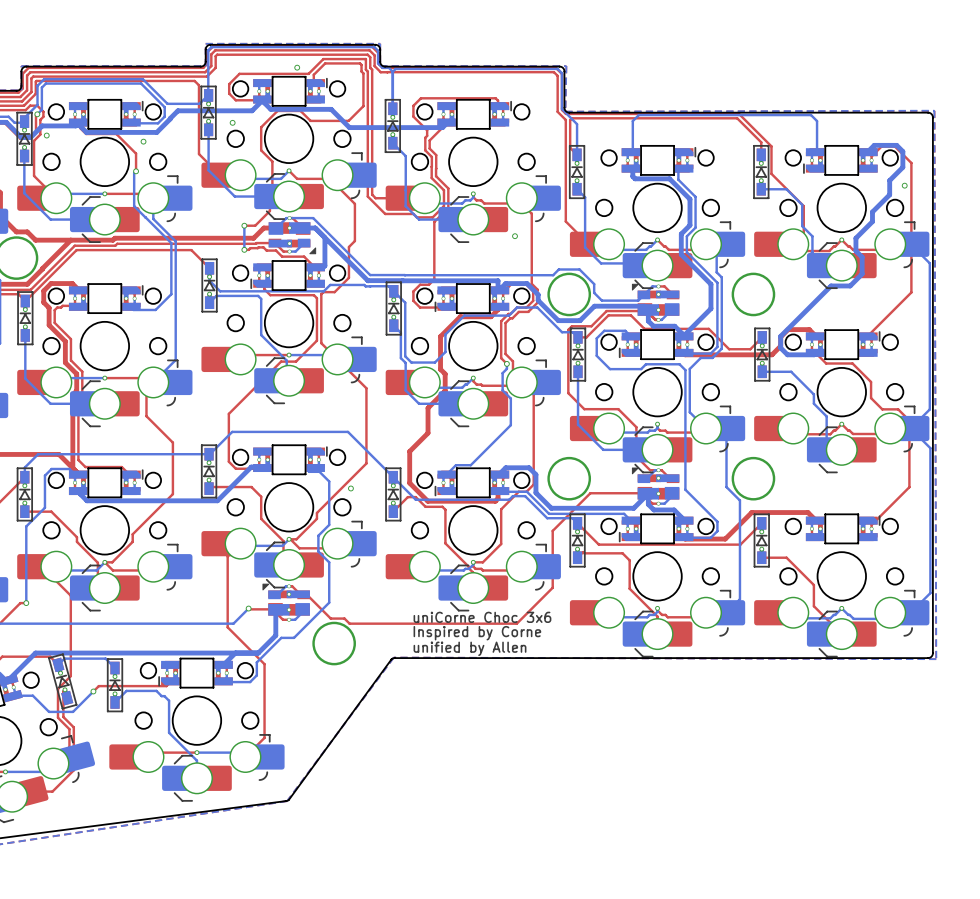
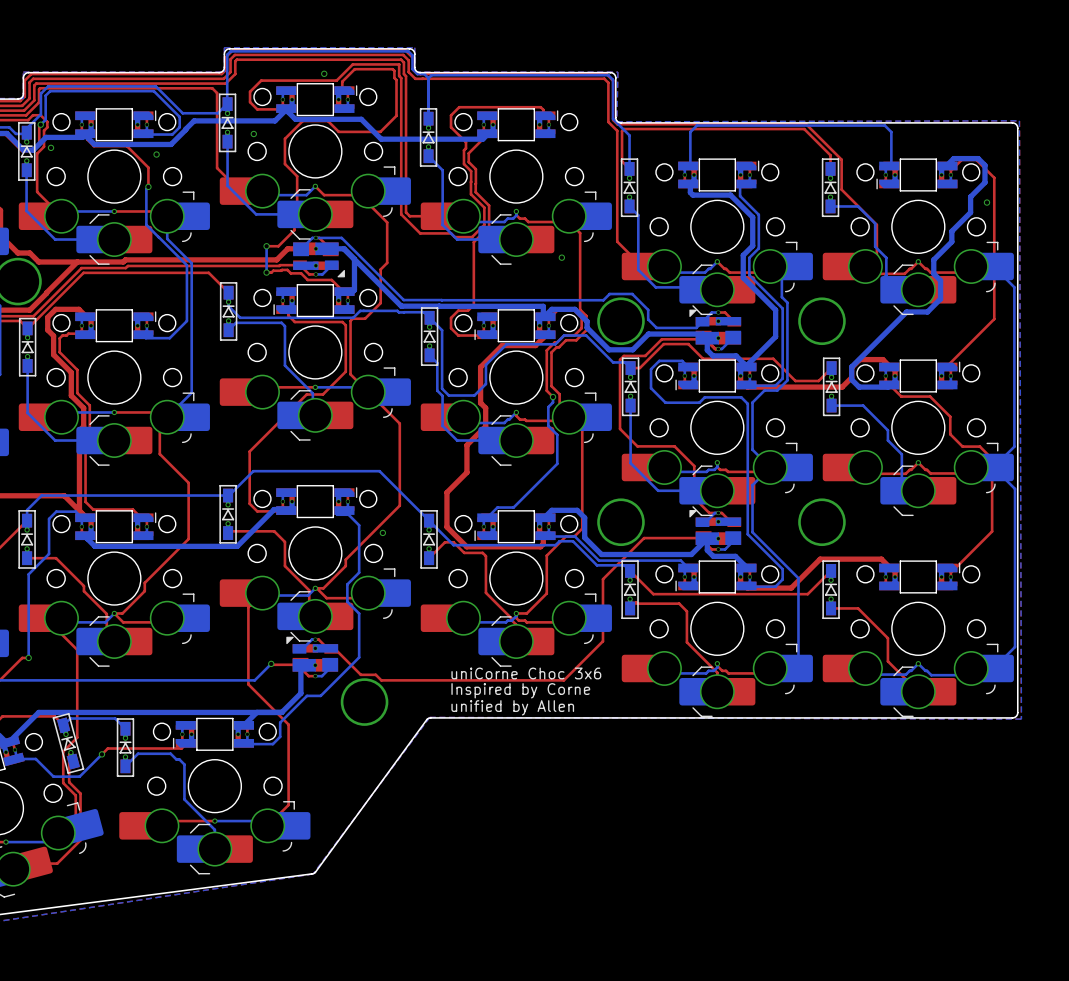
bottom track: none -> (770, 467) (752, 485) (752, 532) (798, 578) (798, 662)
bottom track: (726, 428) (726, 487) (739, 500) (739, 599) (726, 612) -> none

